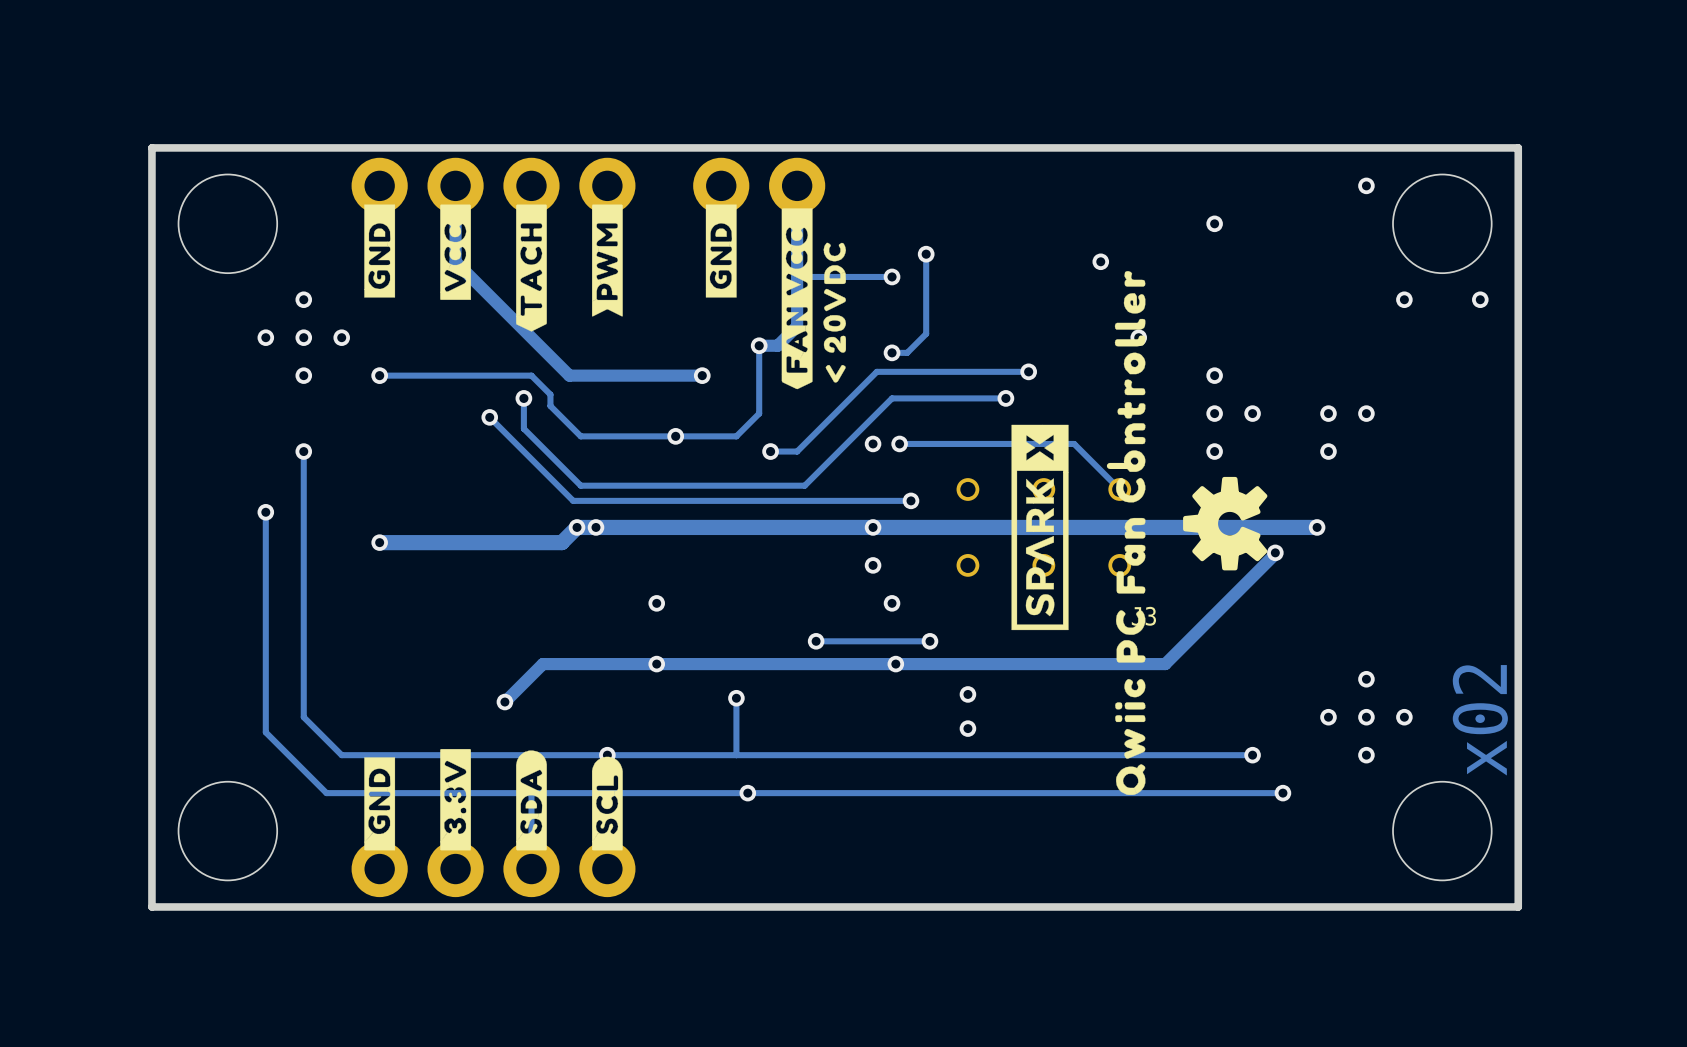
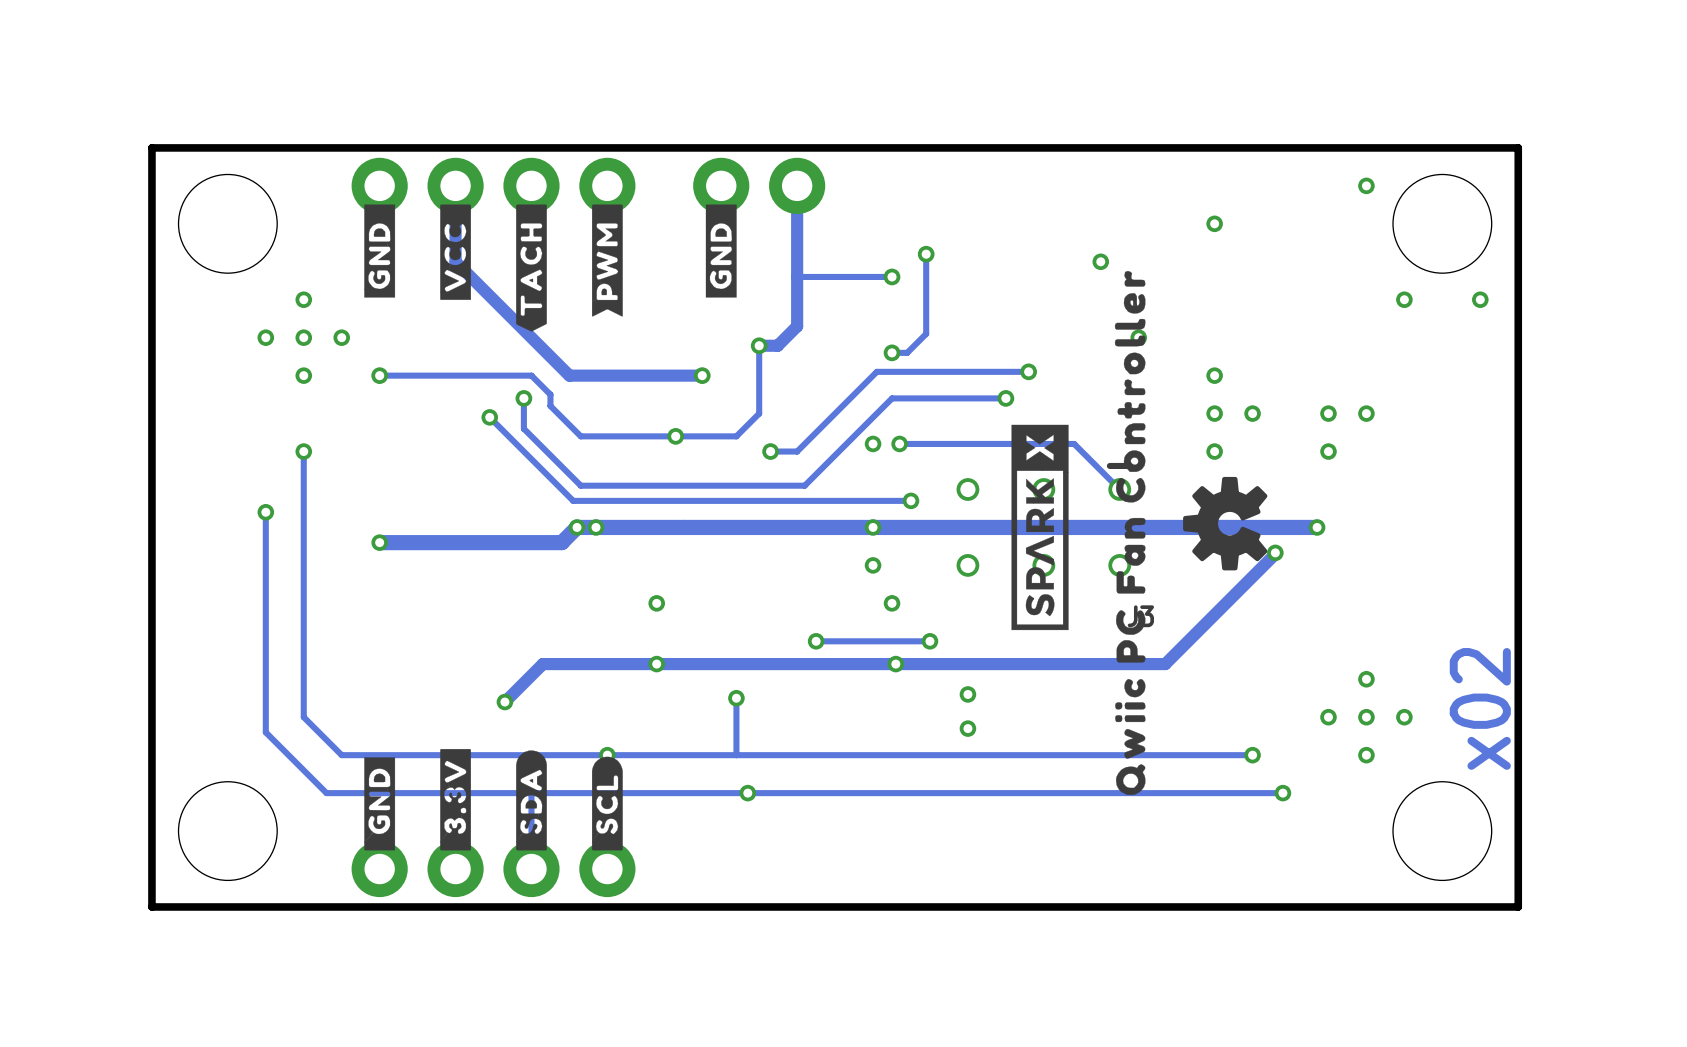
drawing: [781, 208, 847, 390] -> none

